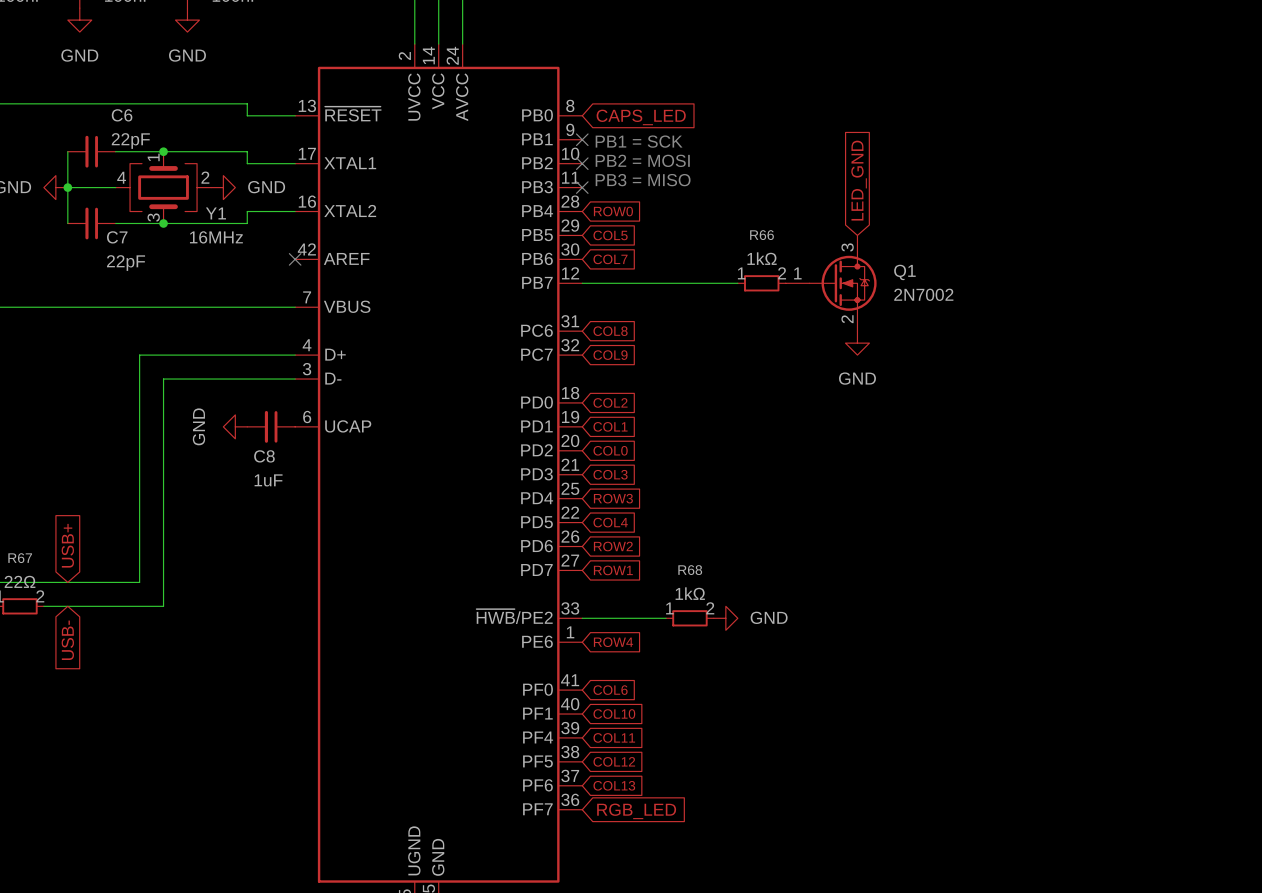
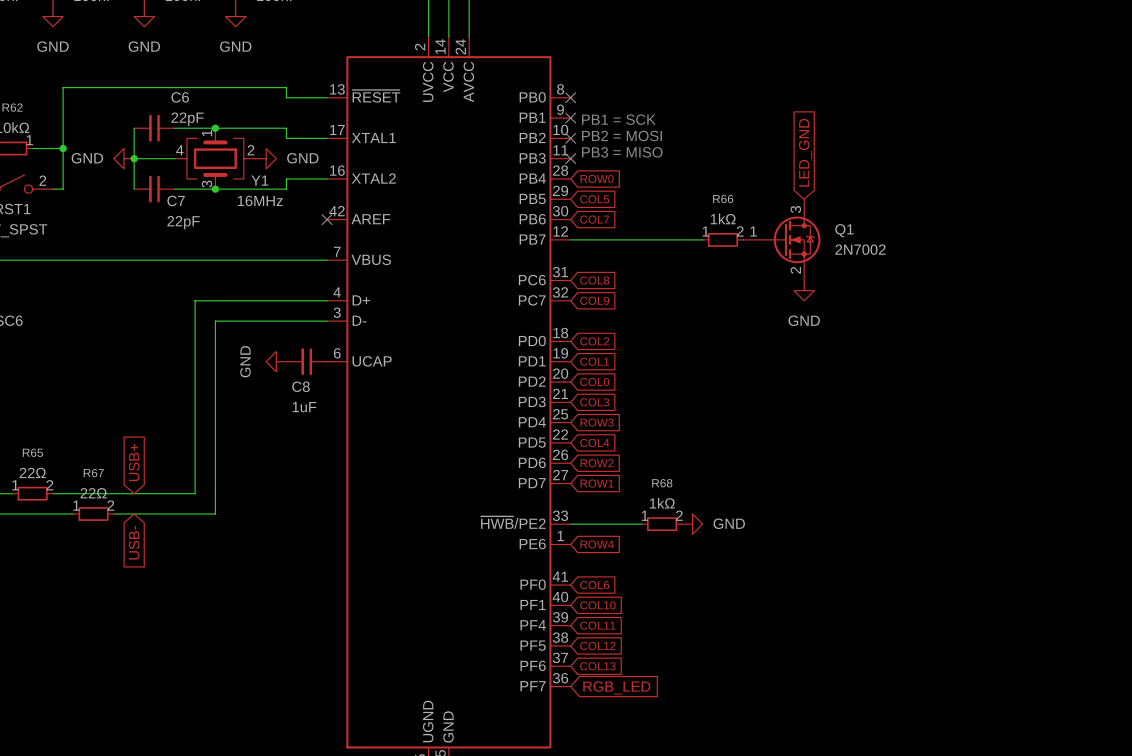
no-connect mark: none -> (570, 97)
global label: CAPS_LED (641, 117) -> none

